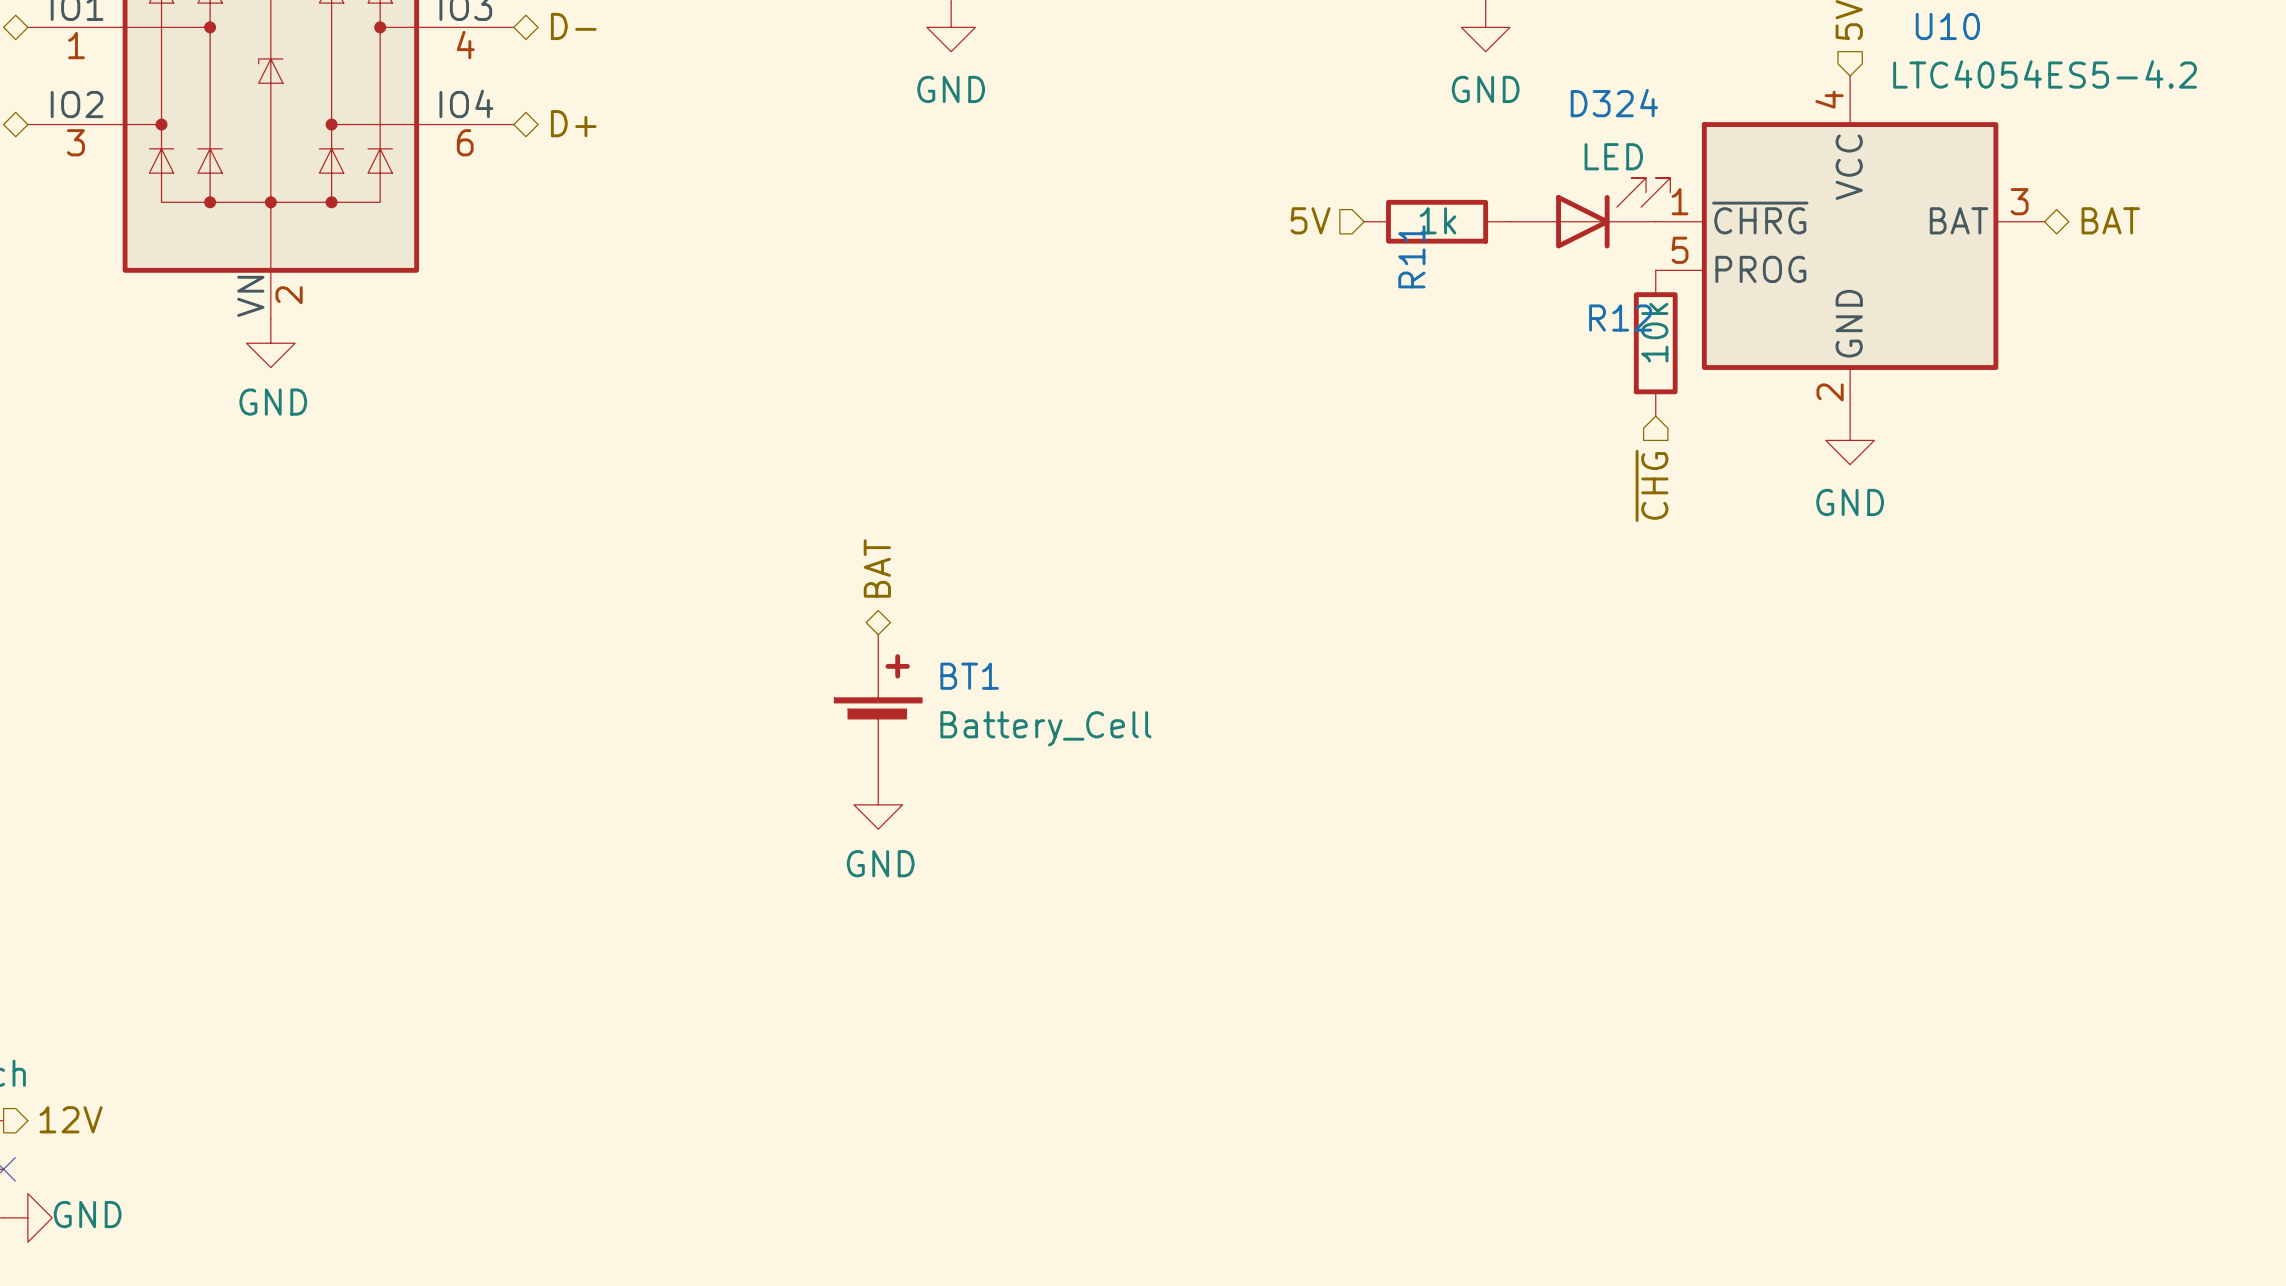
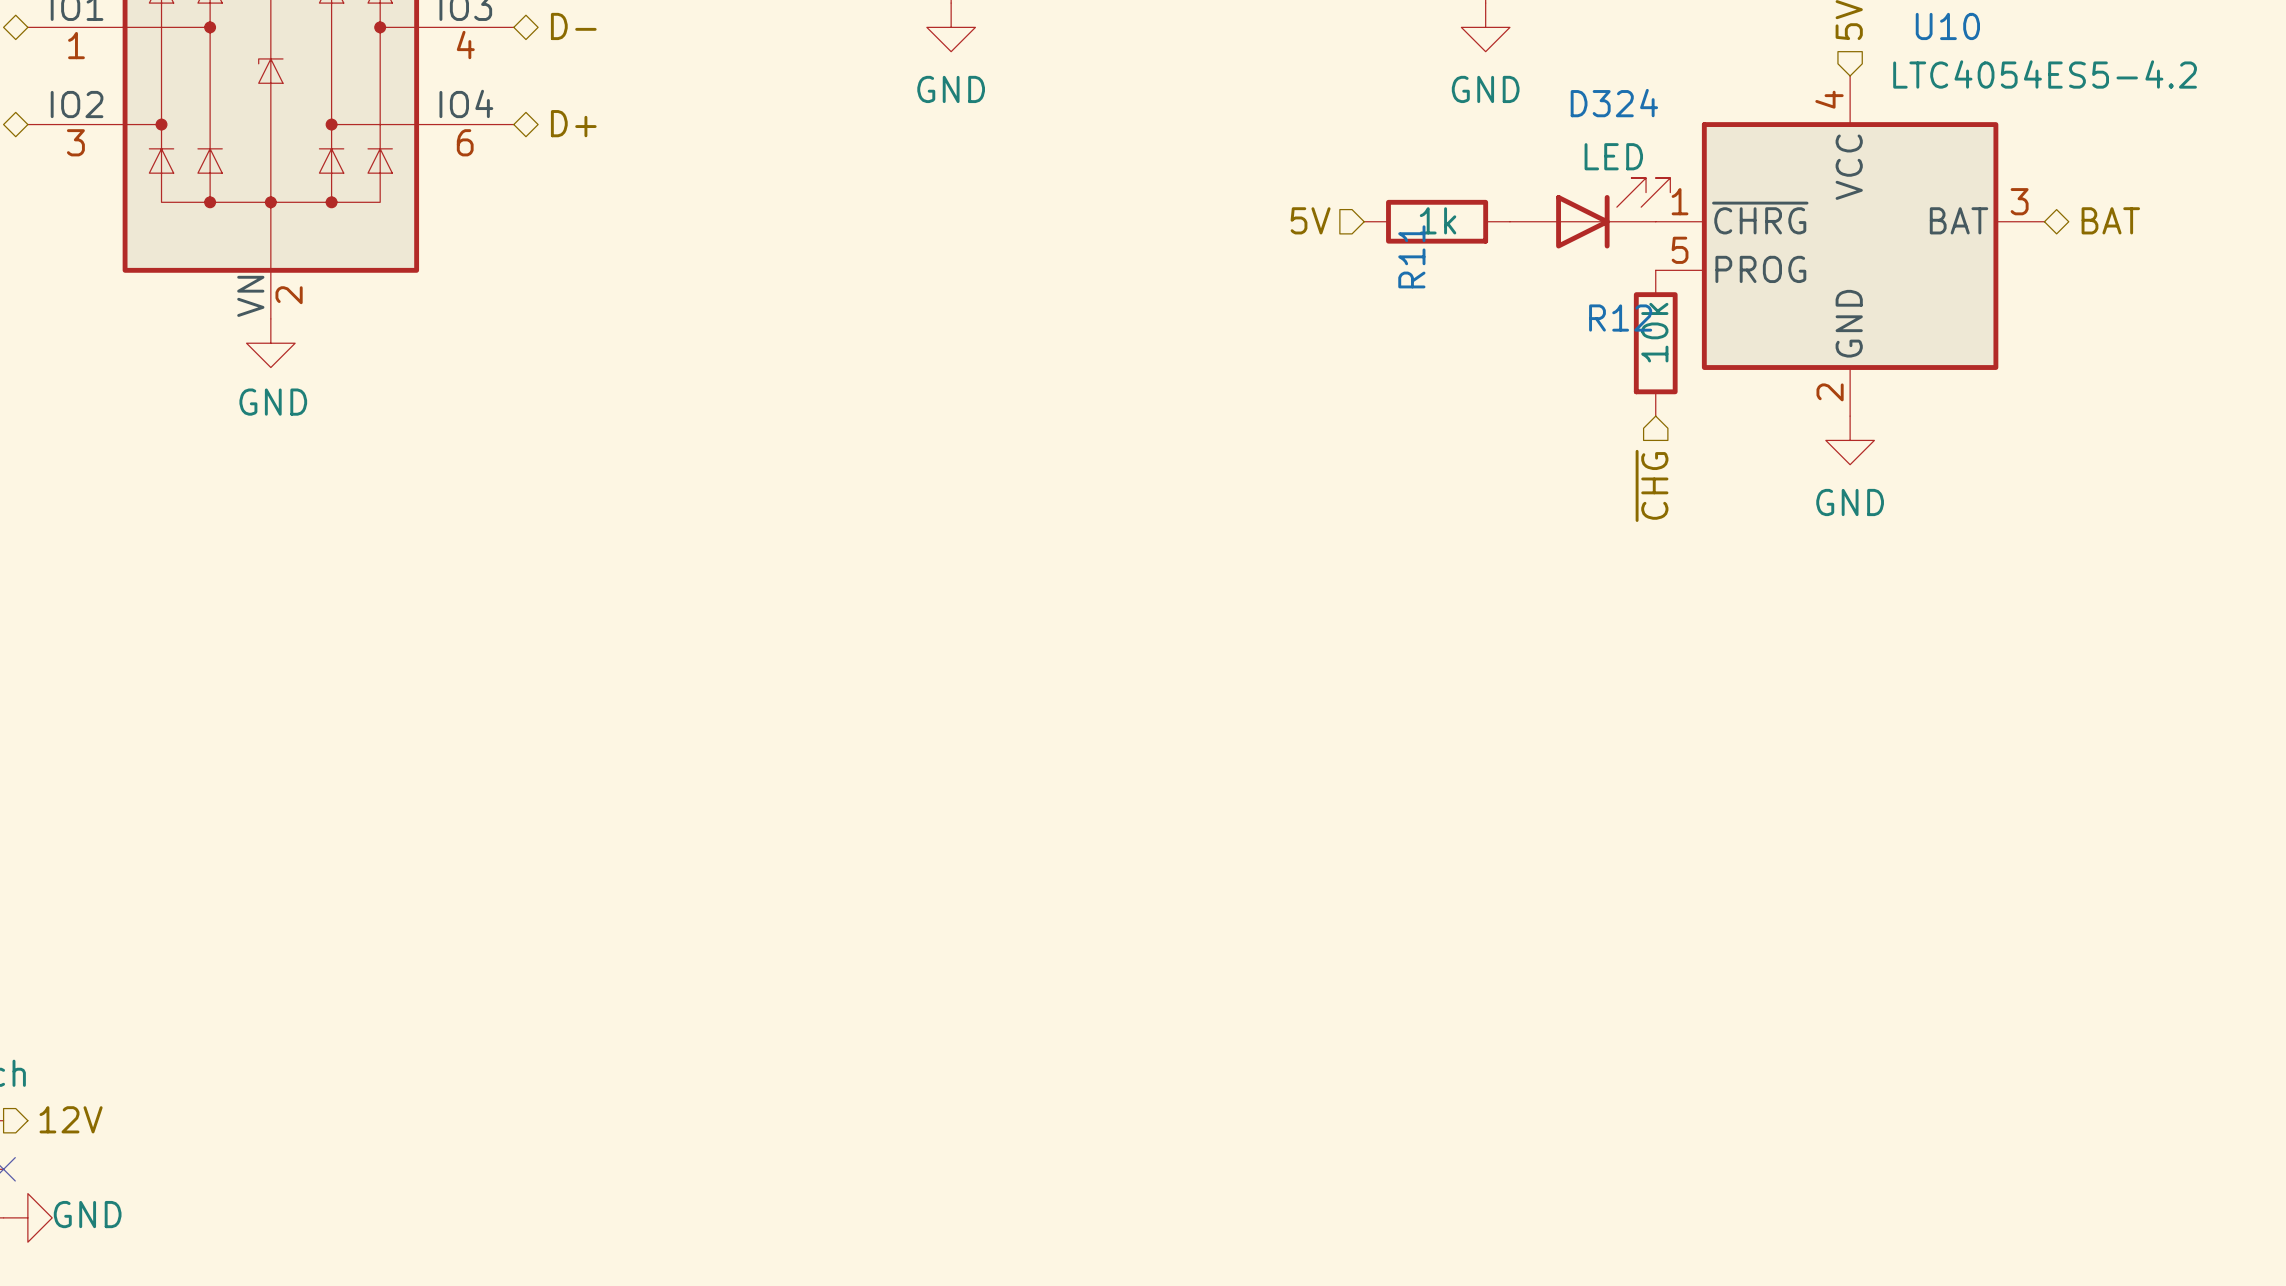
hierarchical label: BAT (877, 568) -> none
BT1: Battery_Cell (878, 707) -> none
power symbol: GND (878, 804) -> none

